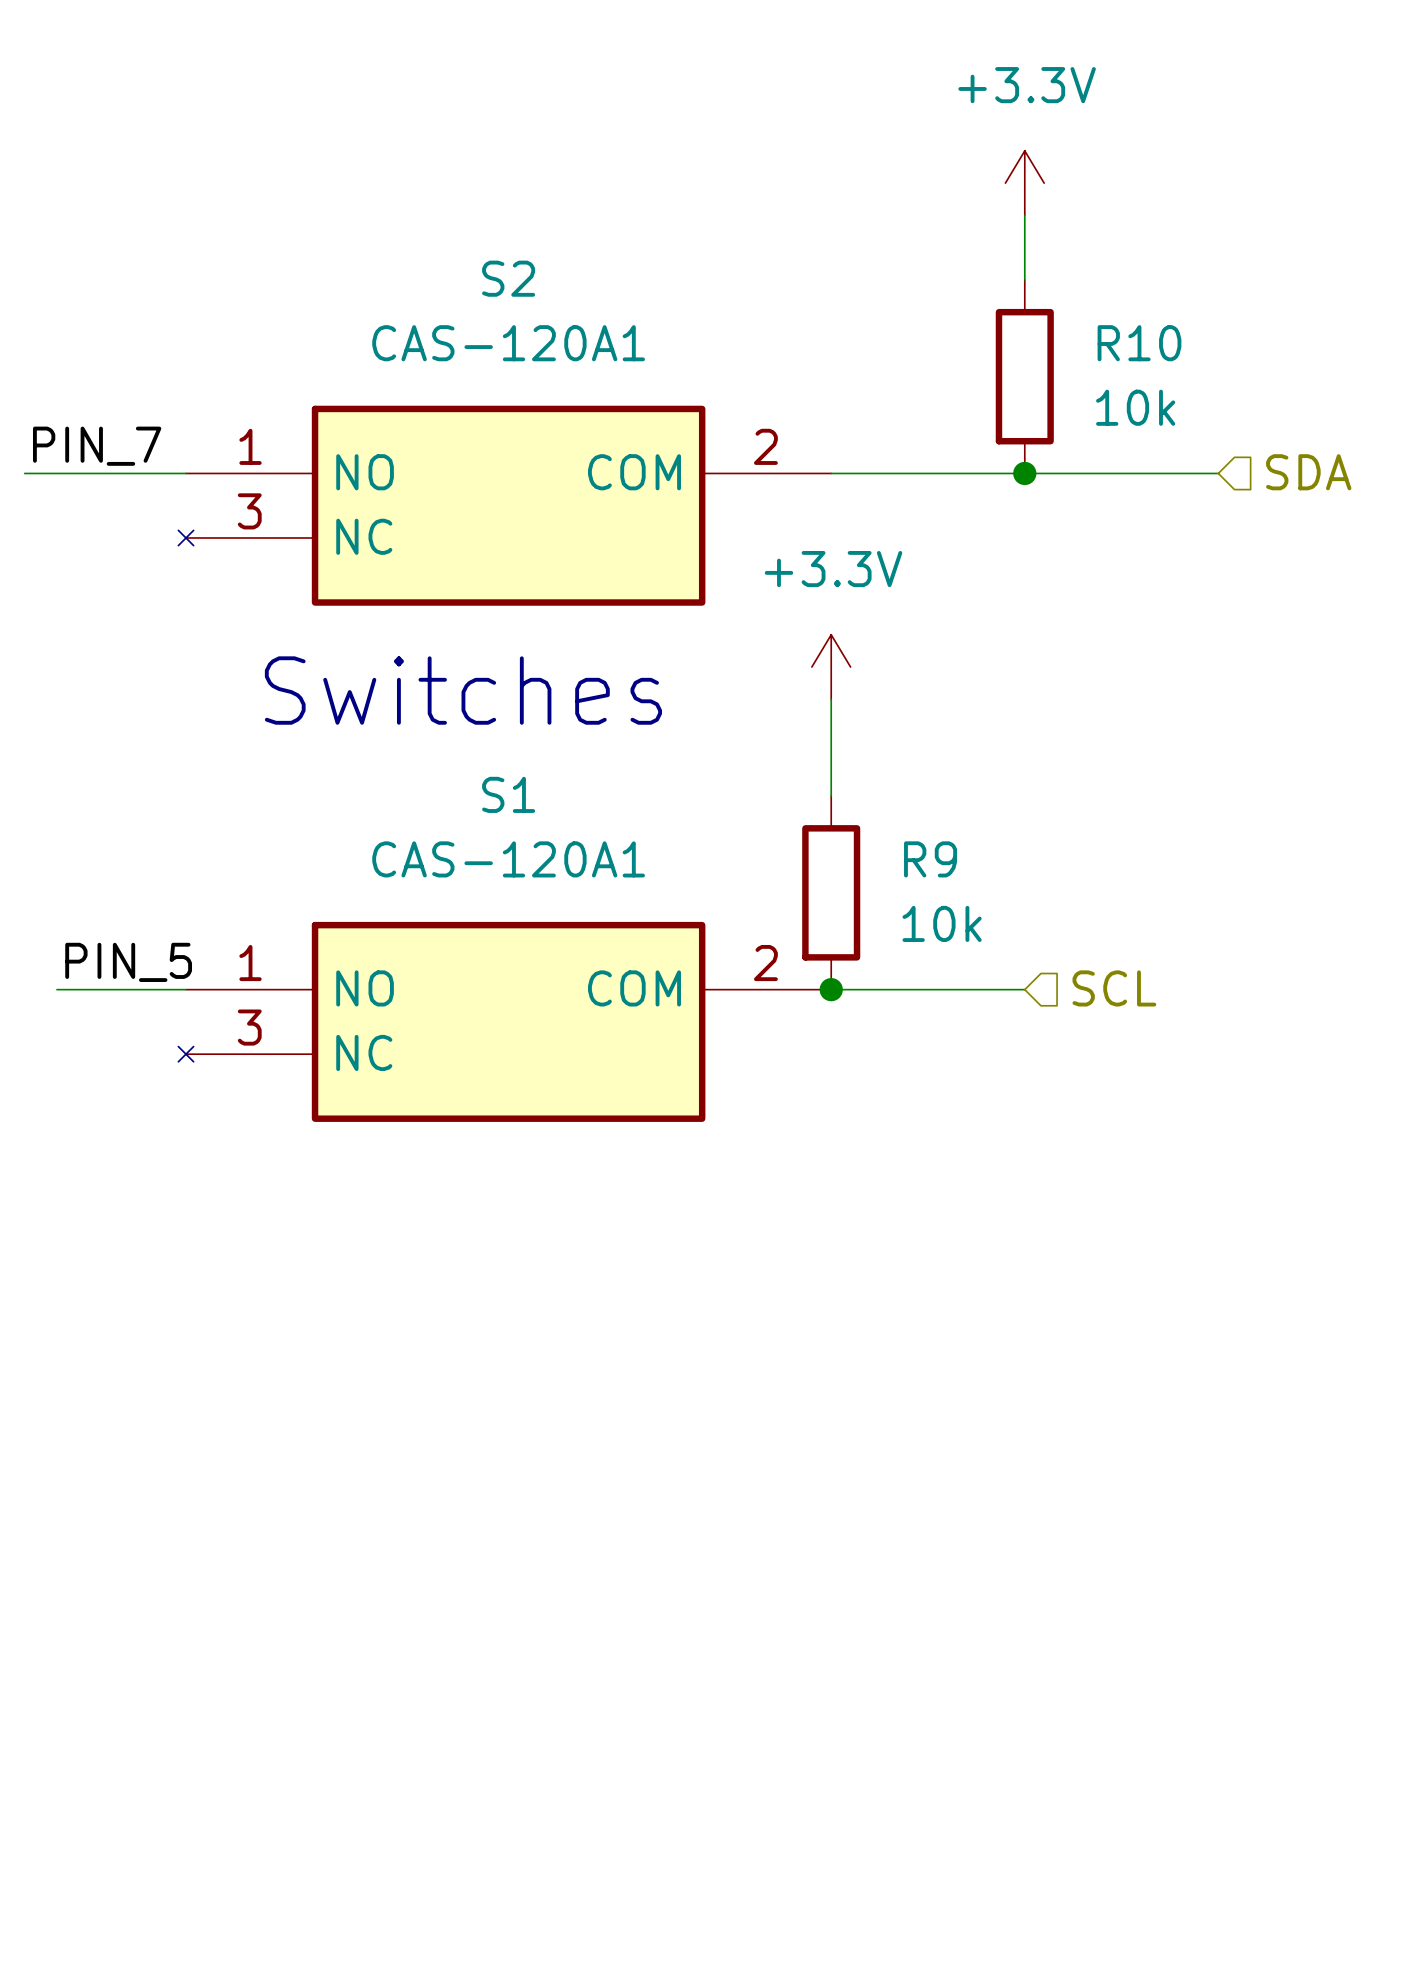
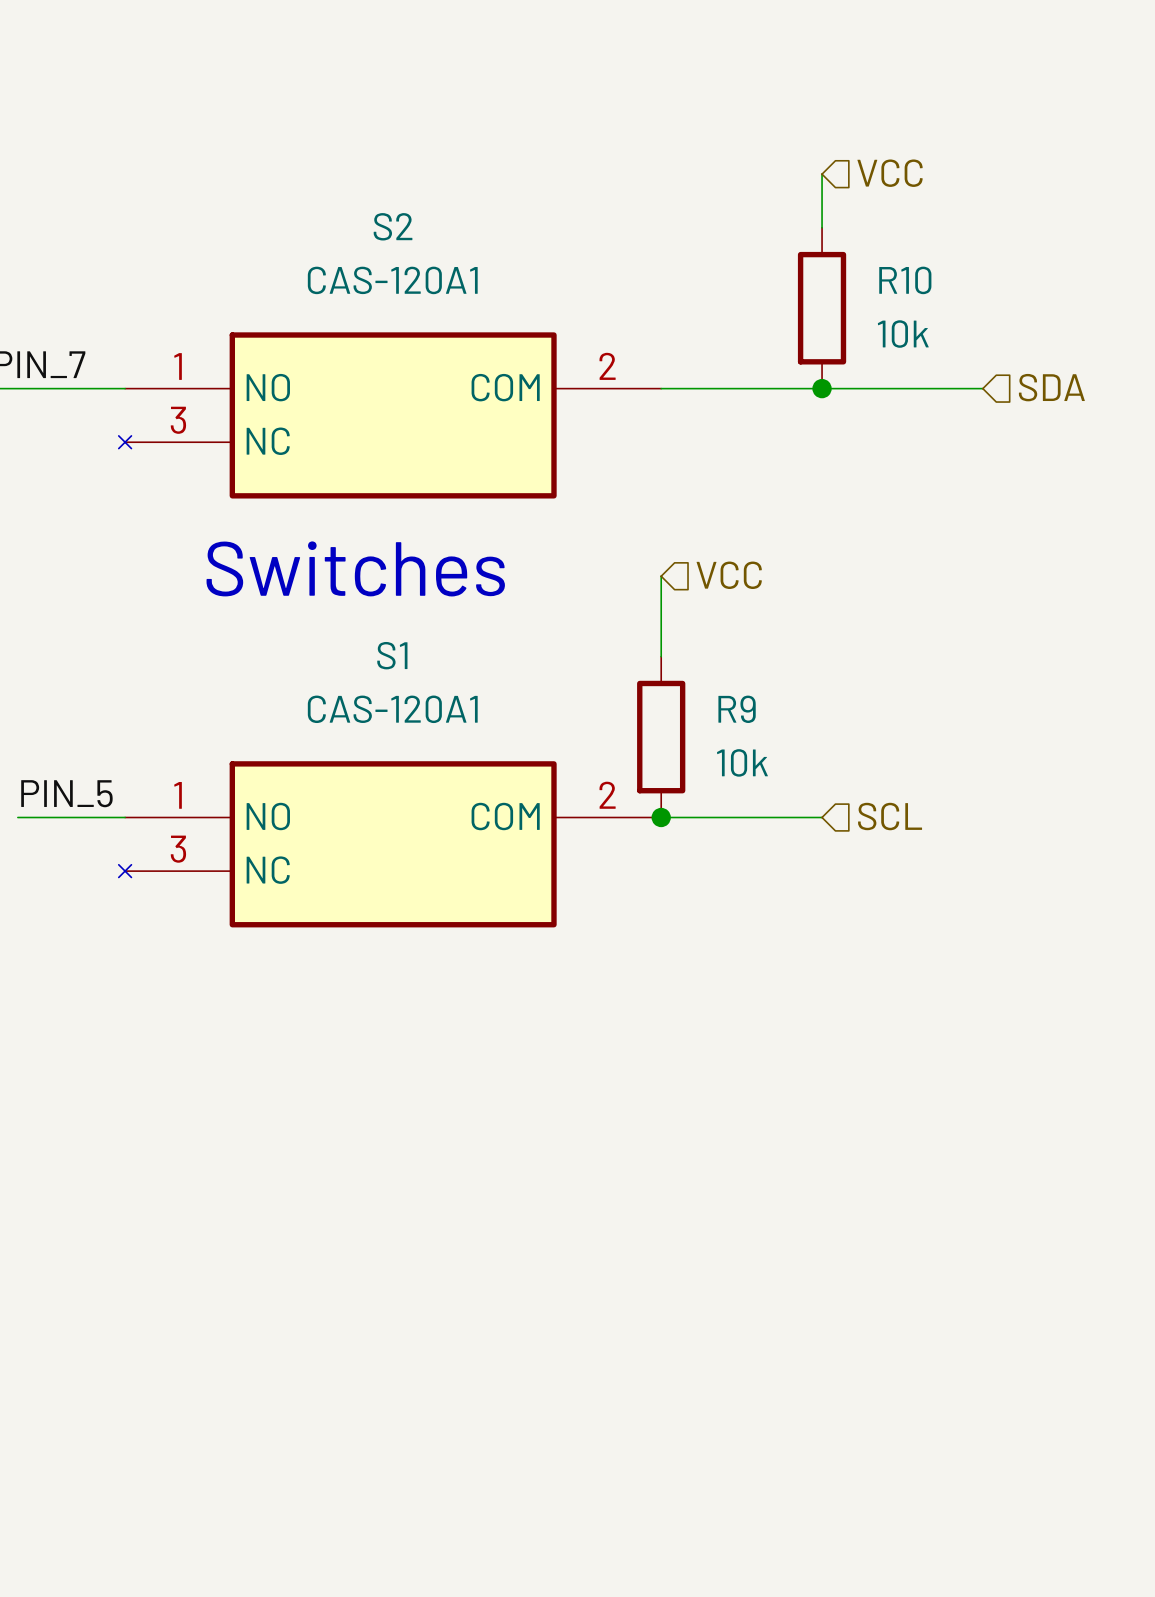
power symbol: +3.3V (1024, 183) -> none
hierarchical label: none -> VCC (890, 173)
power symbol: +3.3V (831, 667) -> none
hierarchical label: none -> VCC (729, 575)

